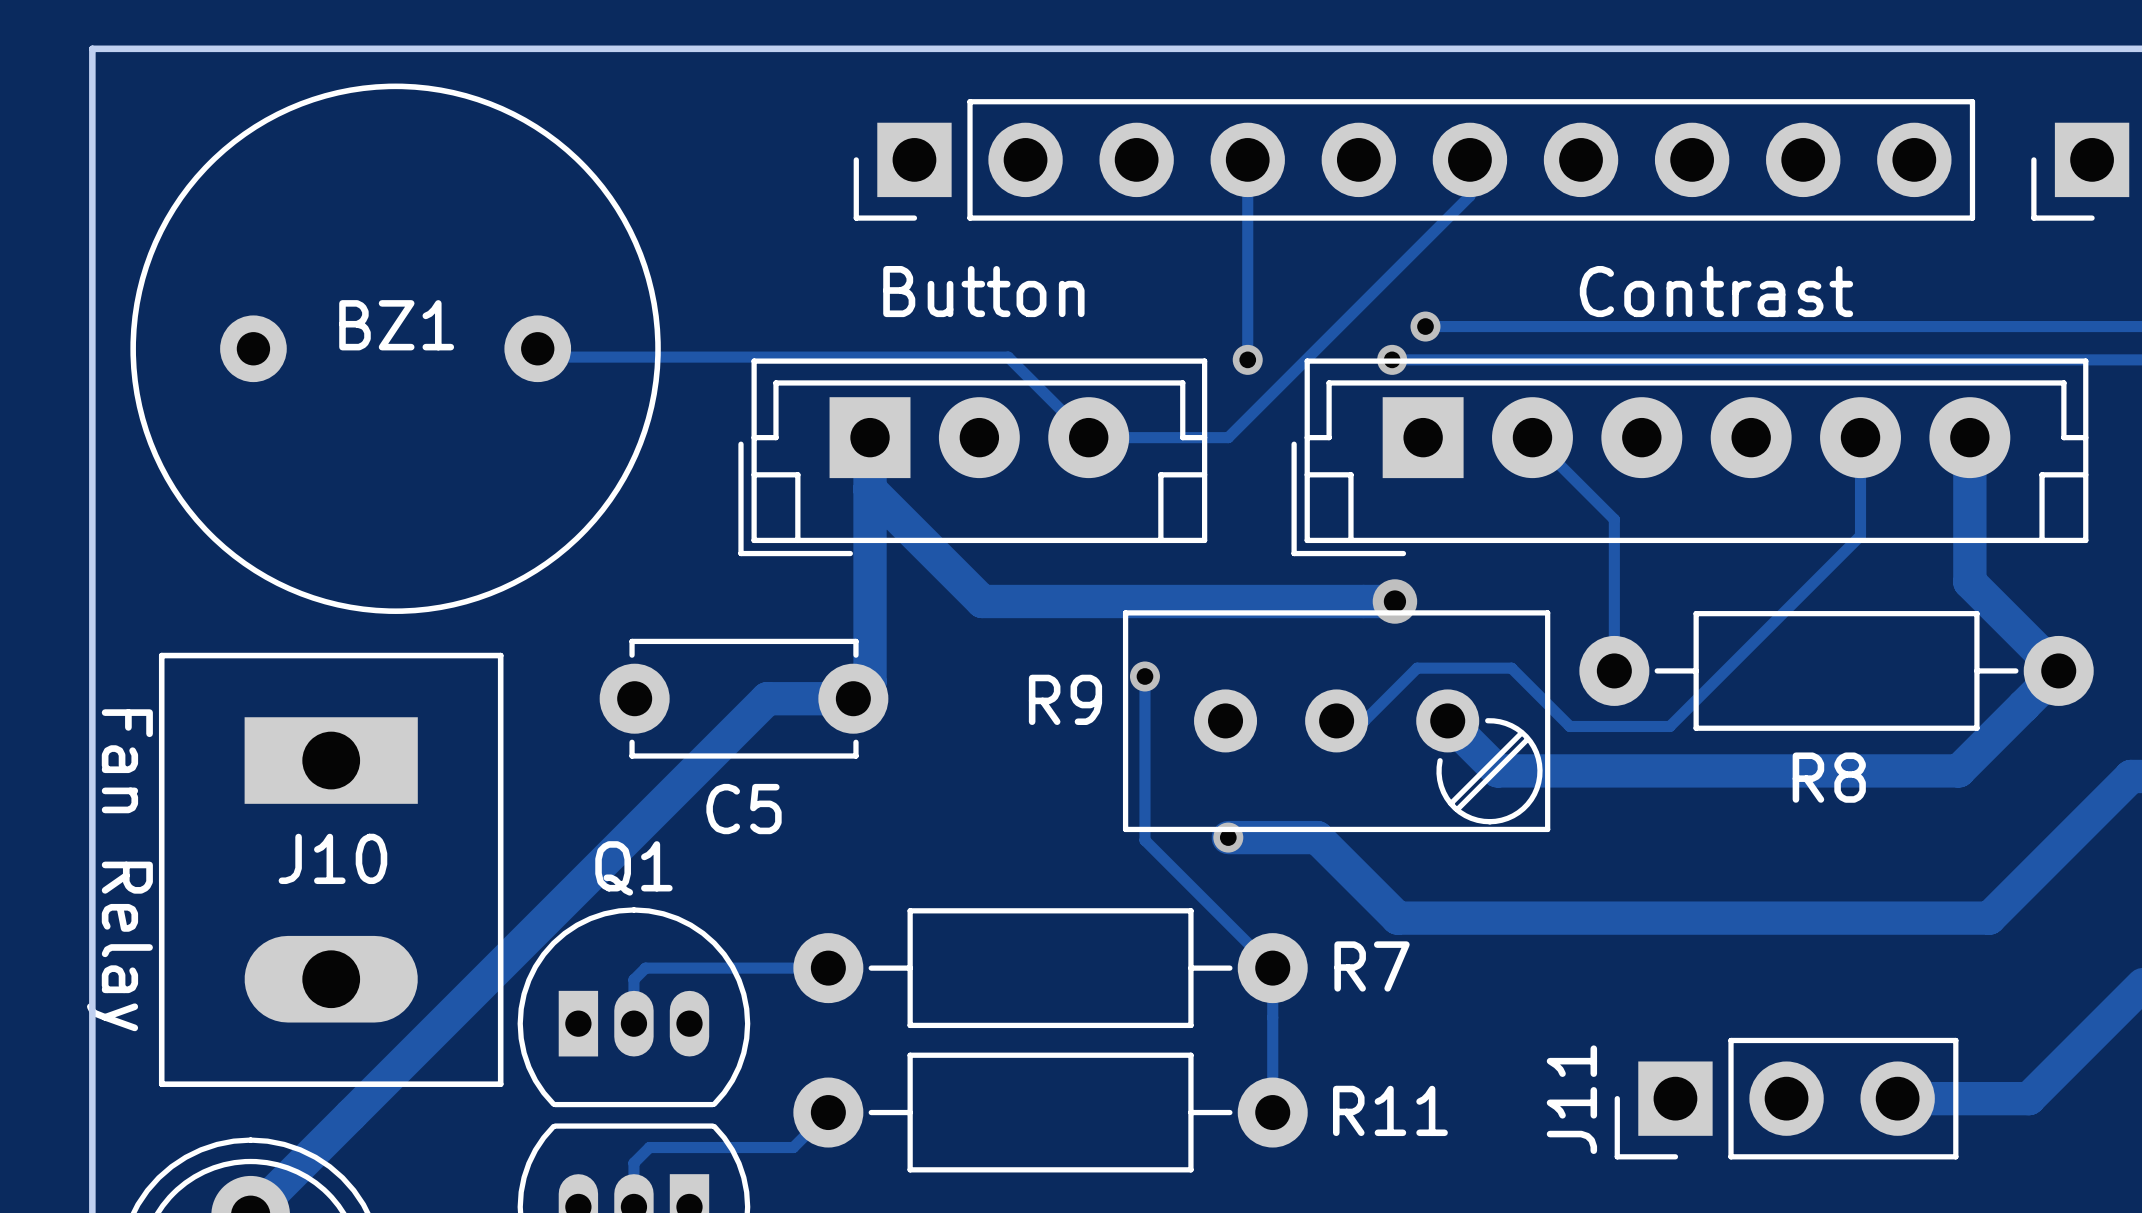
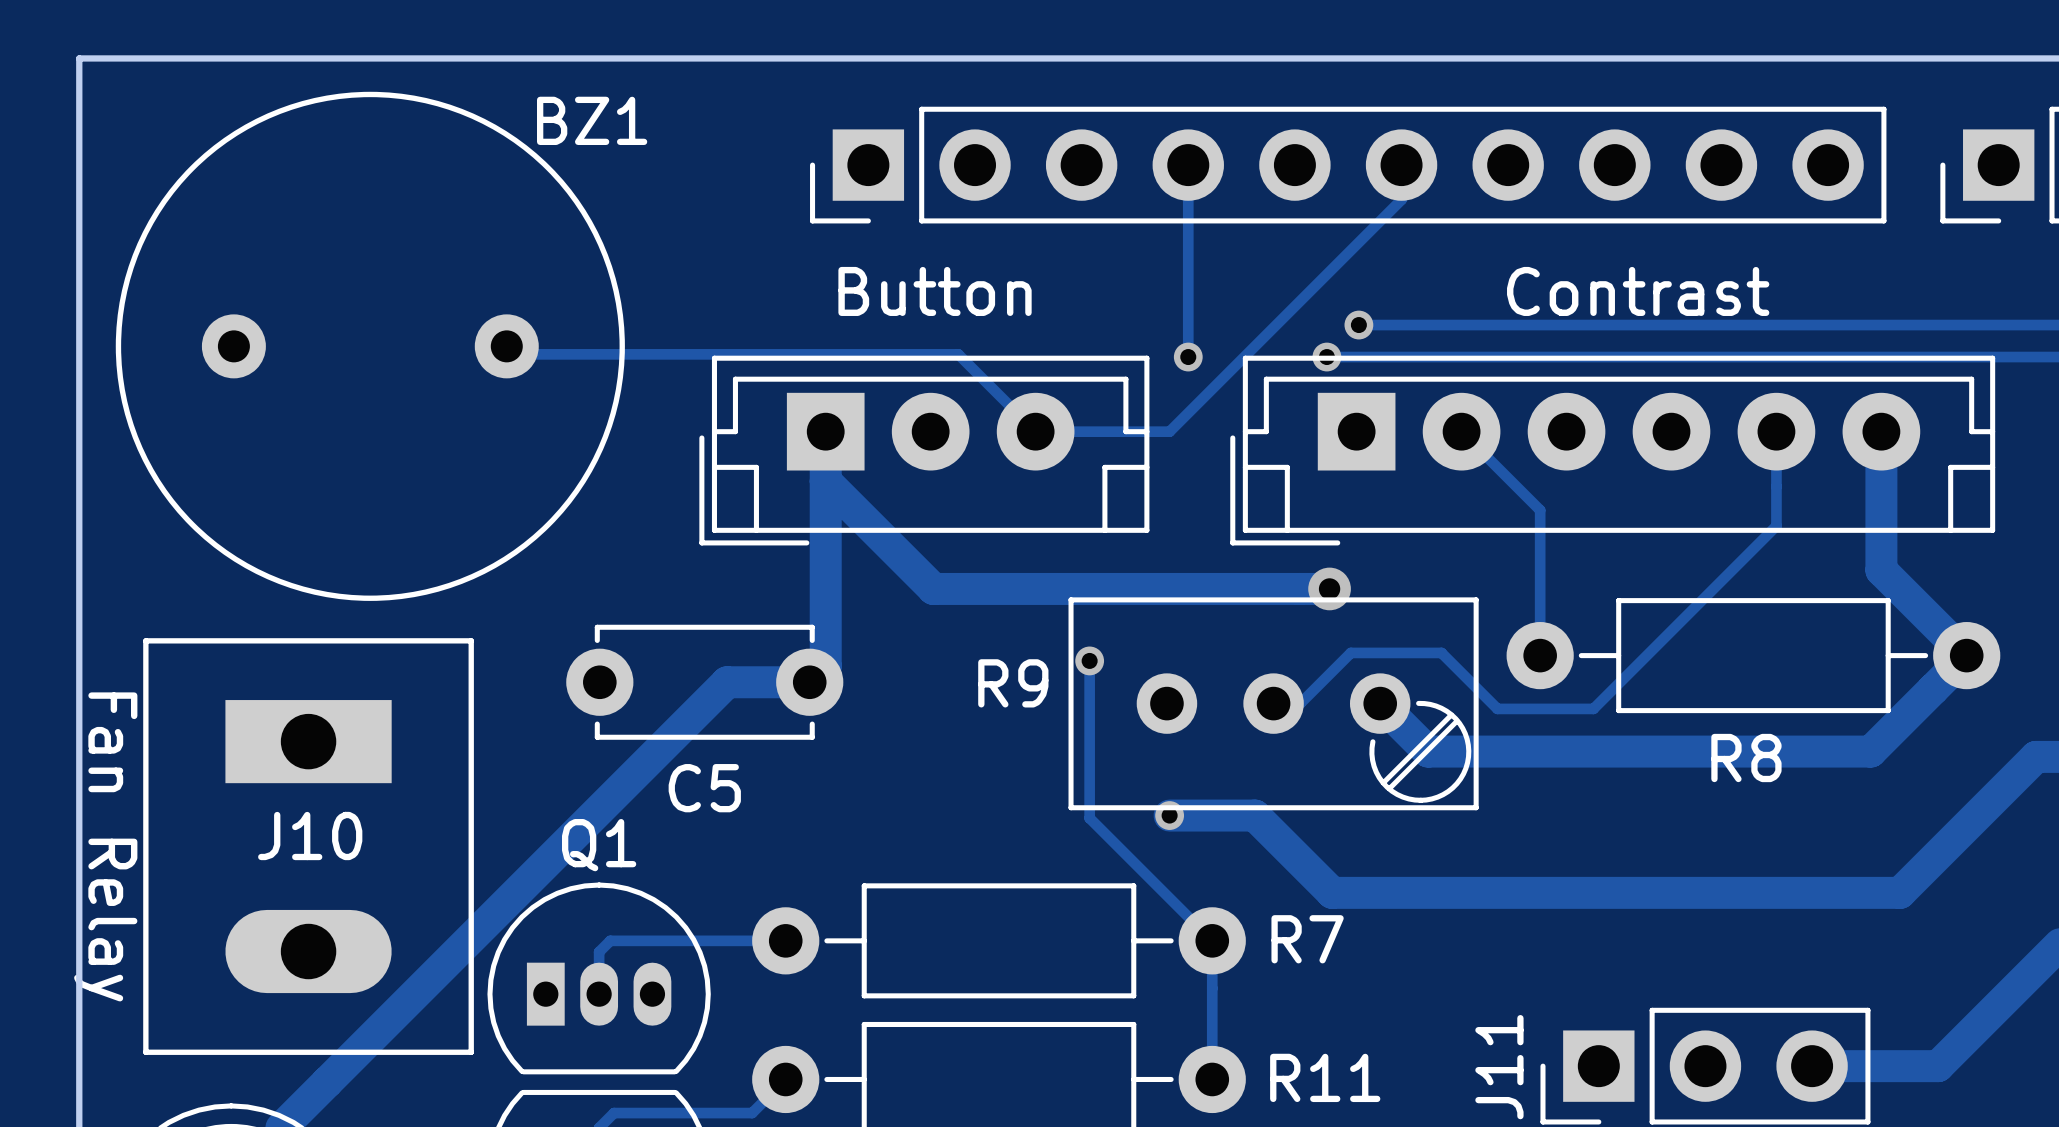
BZ1 name position: BZ1 (396, 325) -> BZ1 (592, 120)

